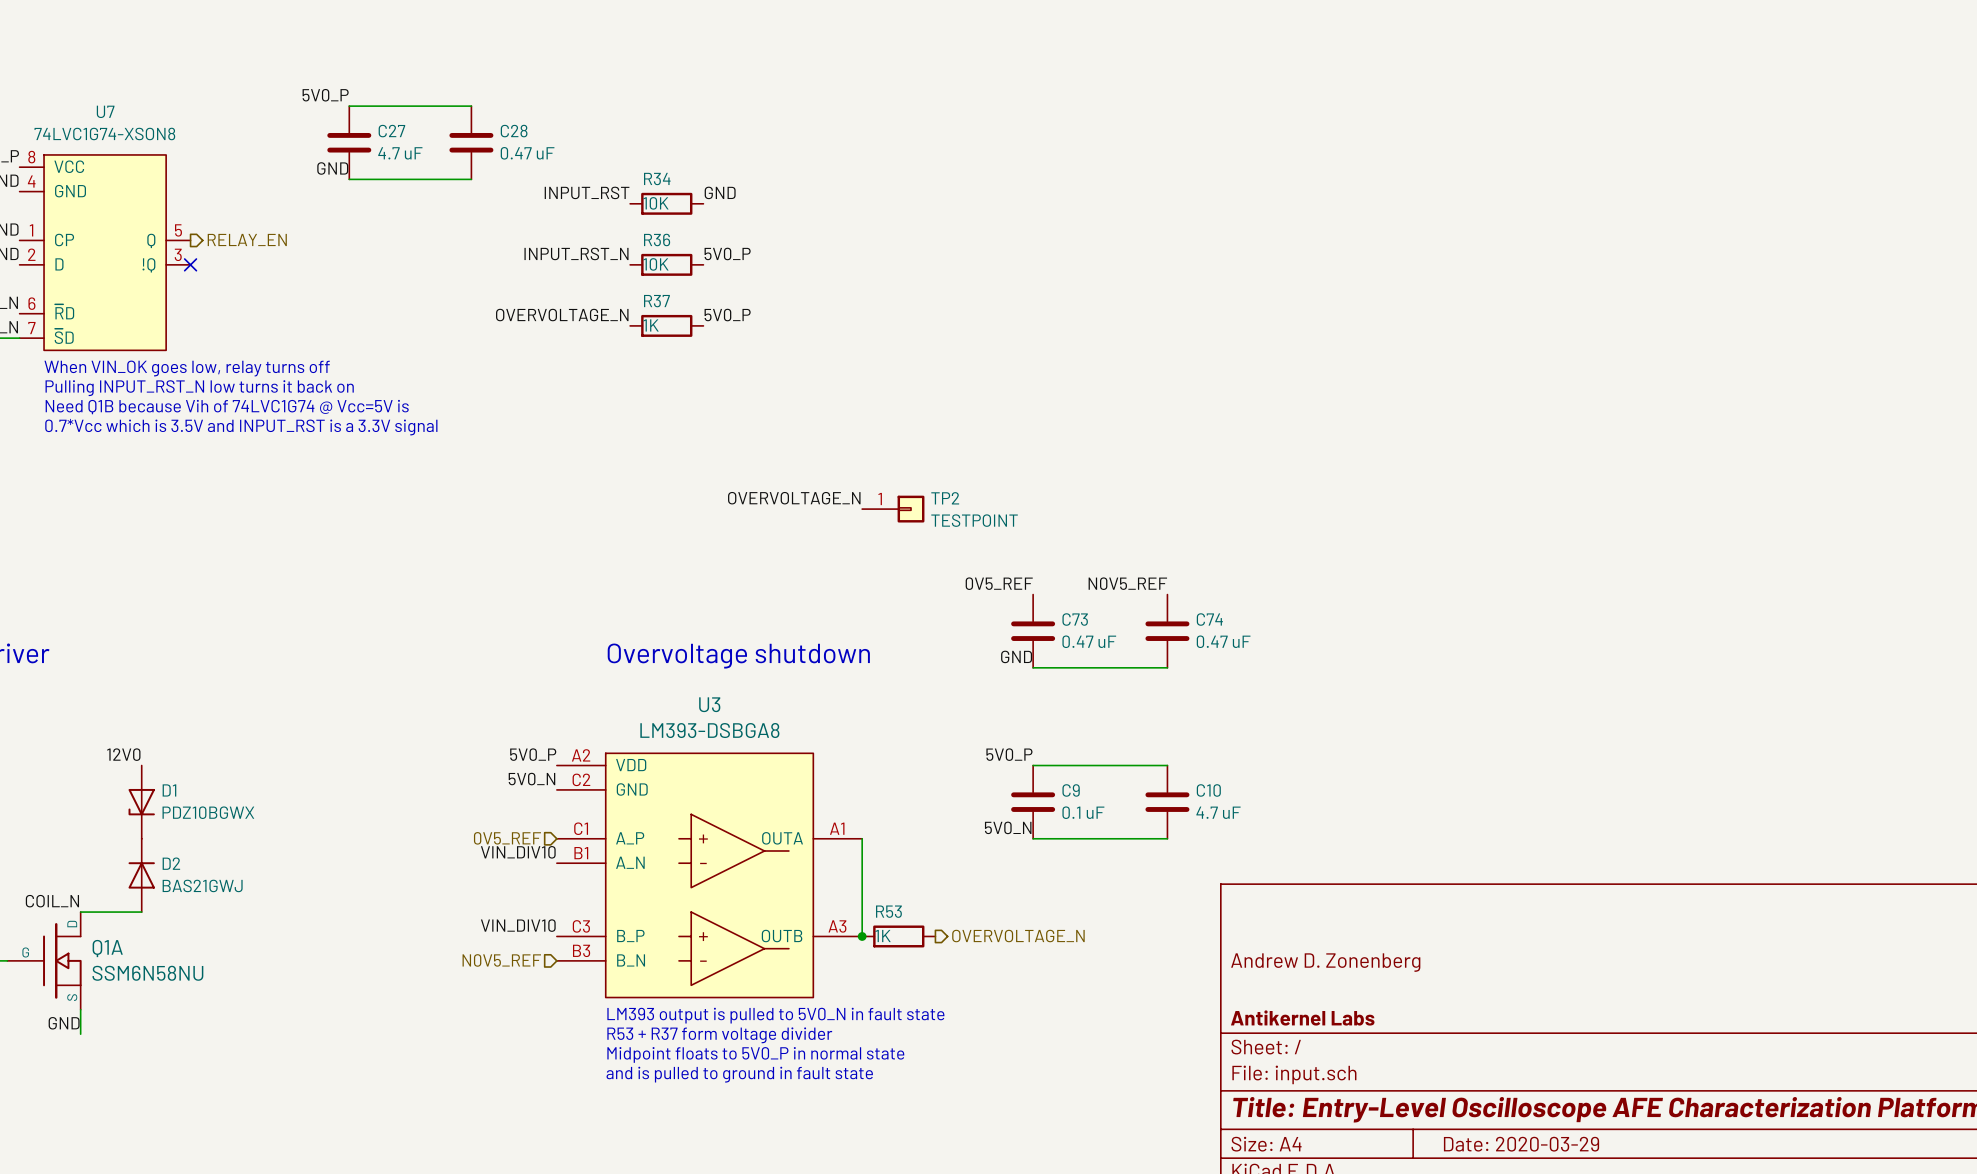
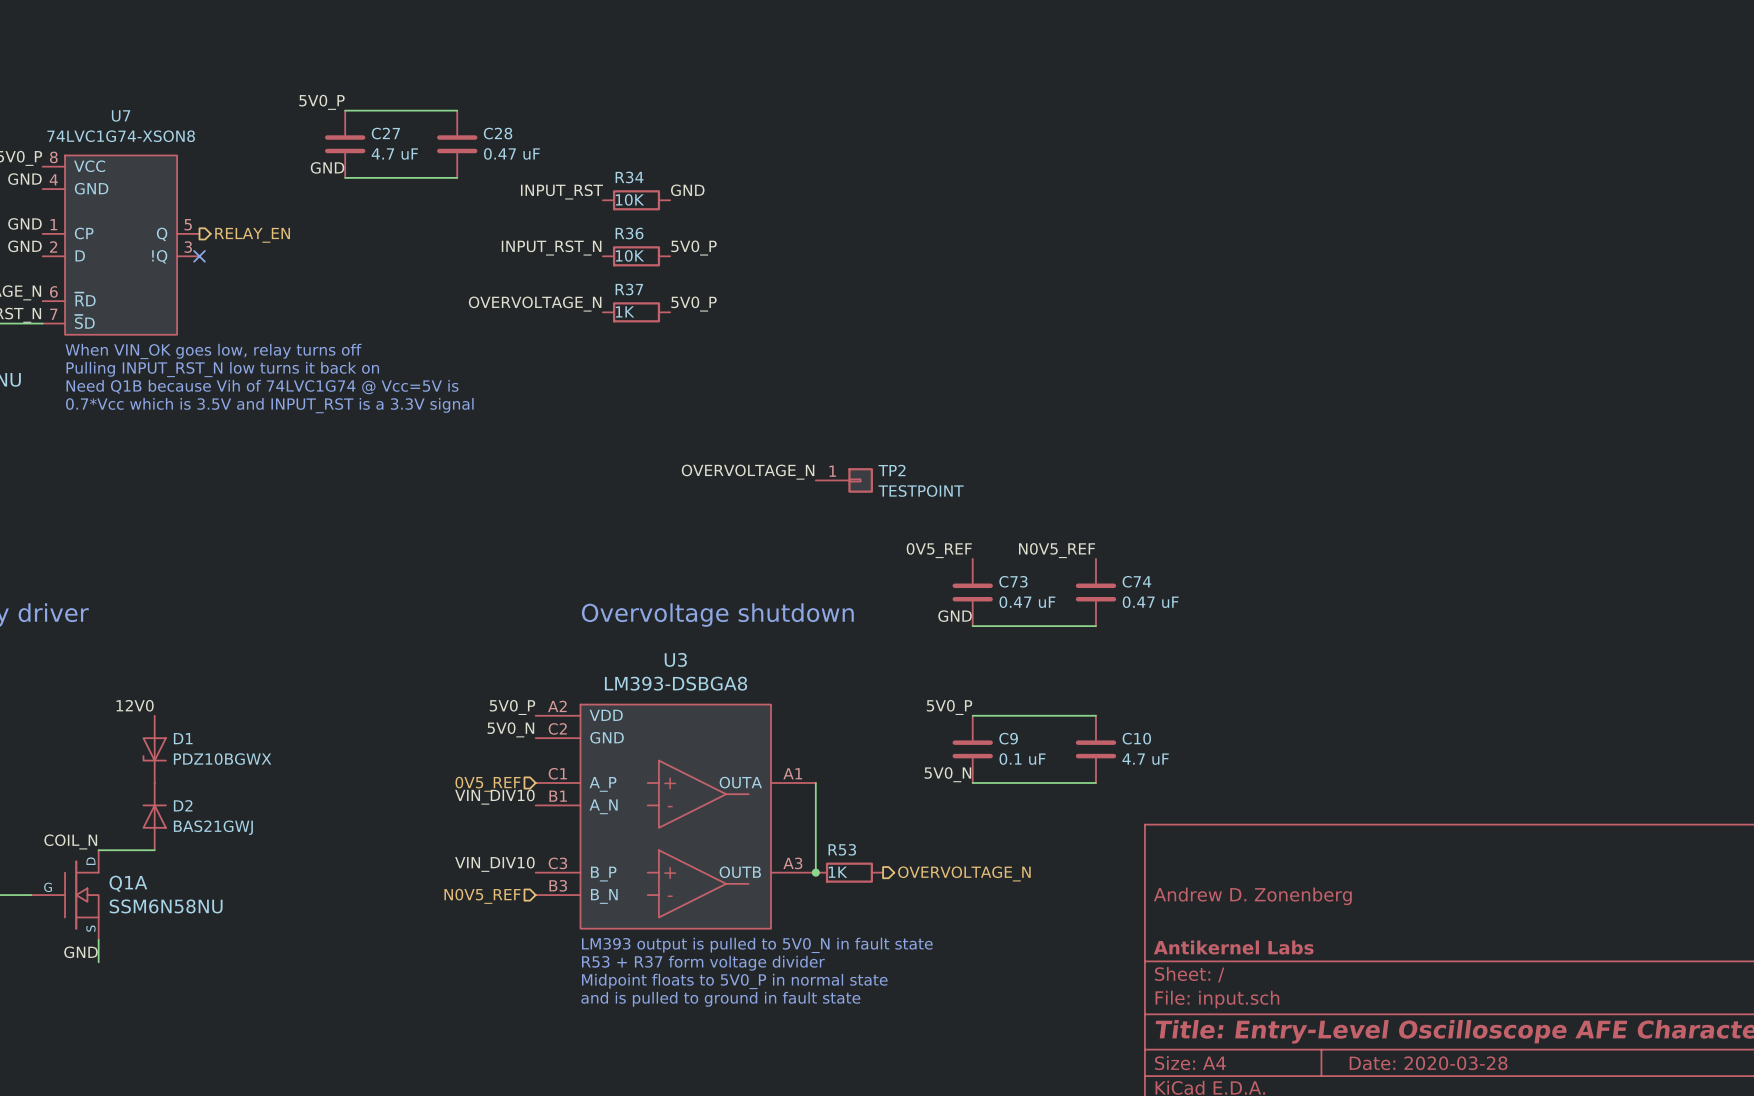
title block: Date: 2020-03-29 (1521, 1144) -> Date: 2020-03-28 (1428, 1063)

